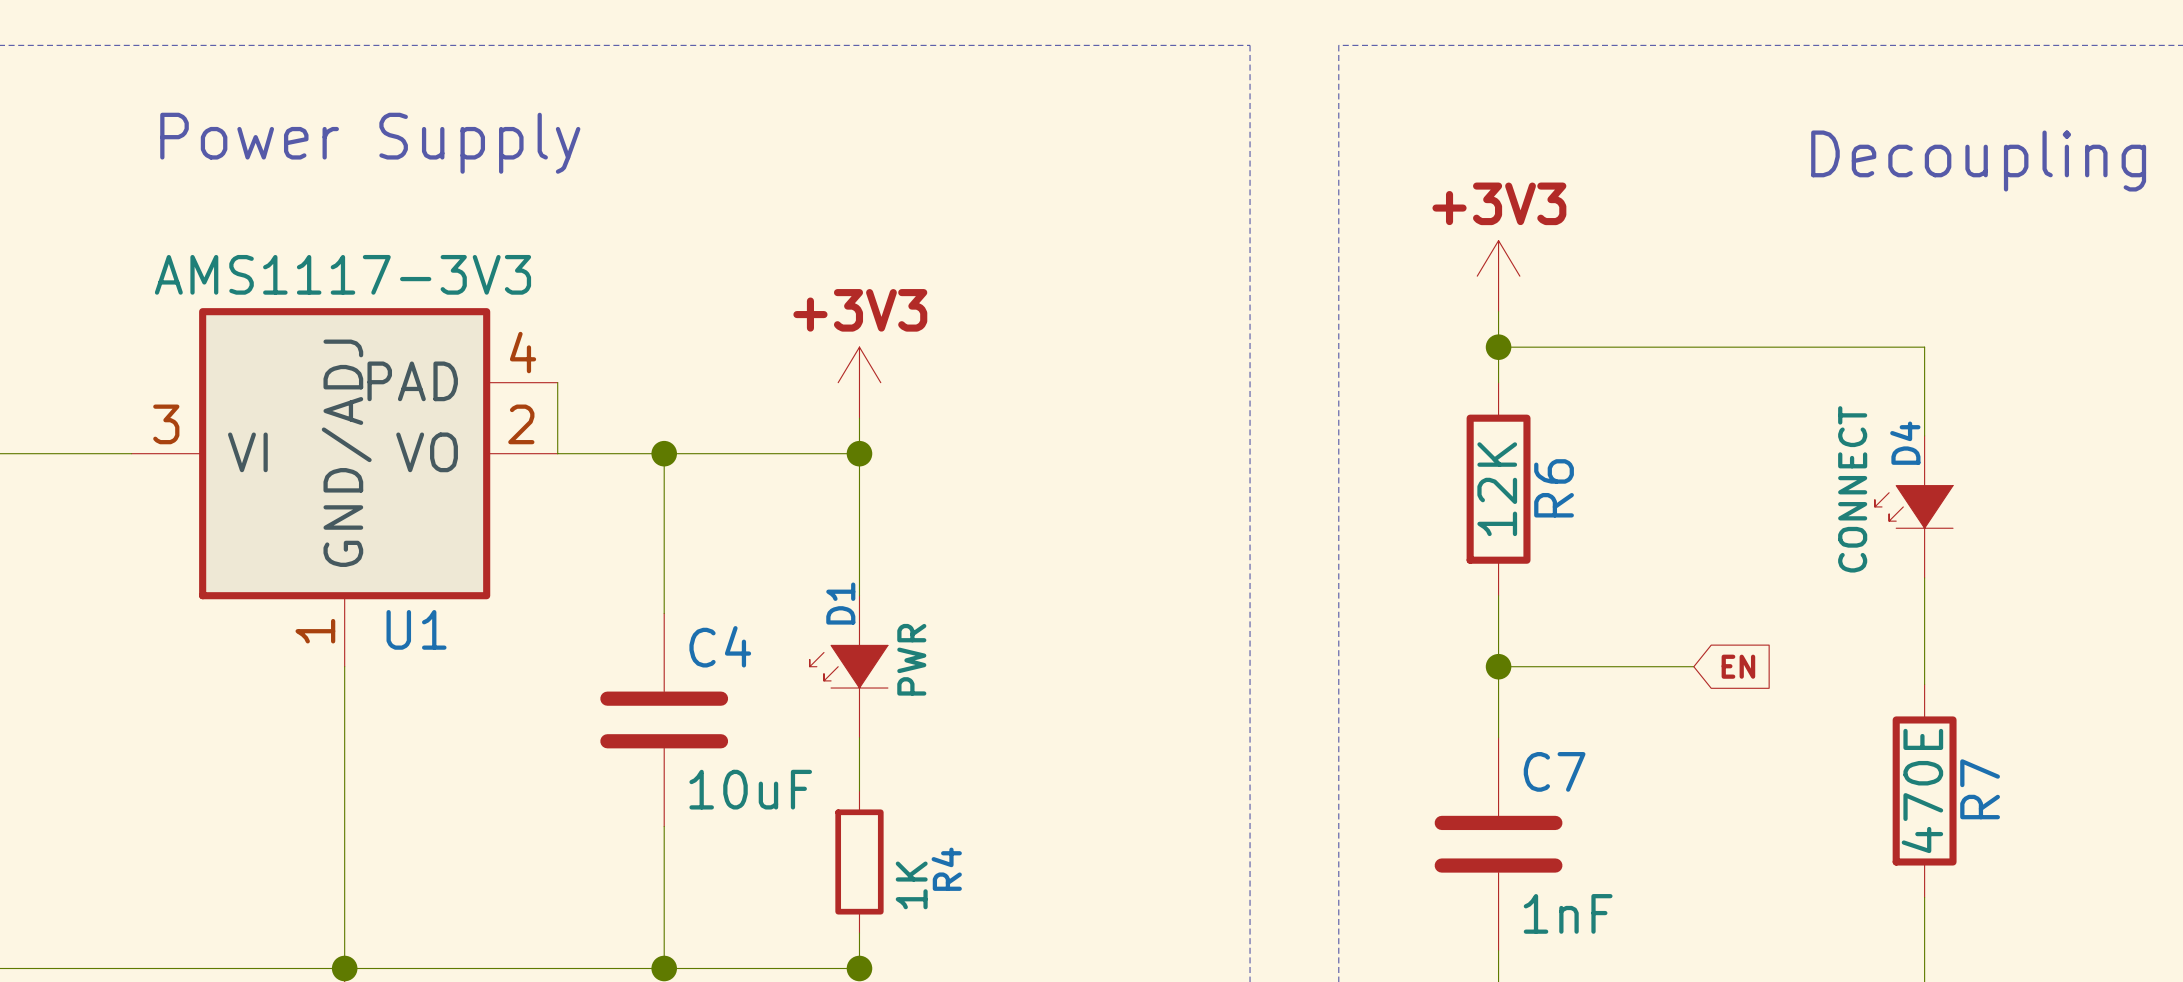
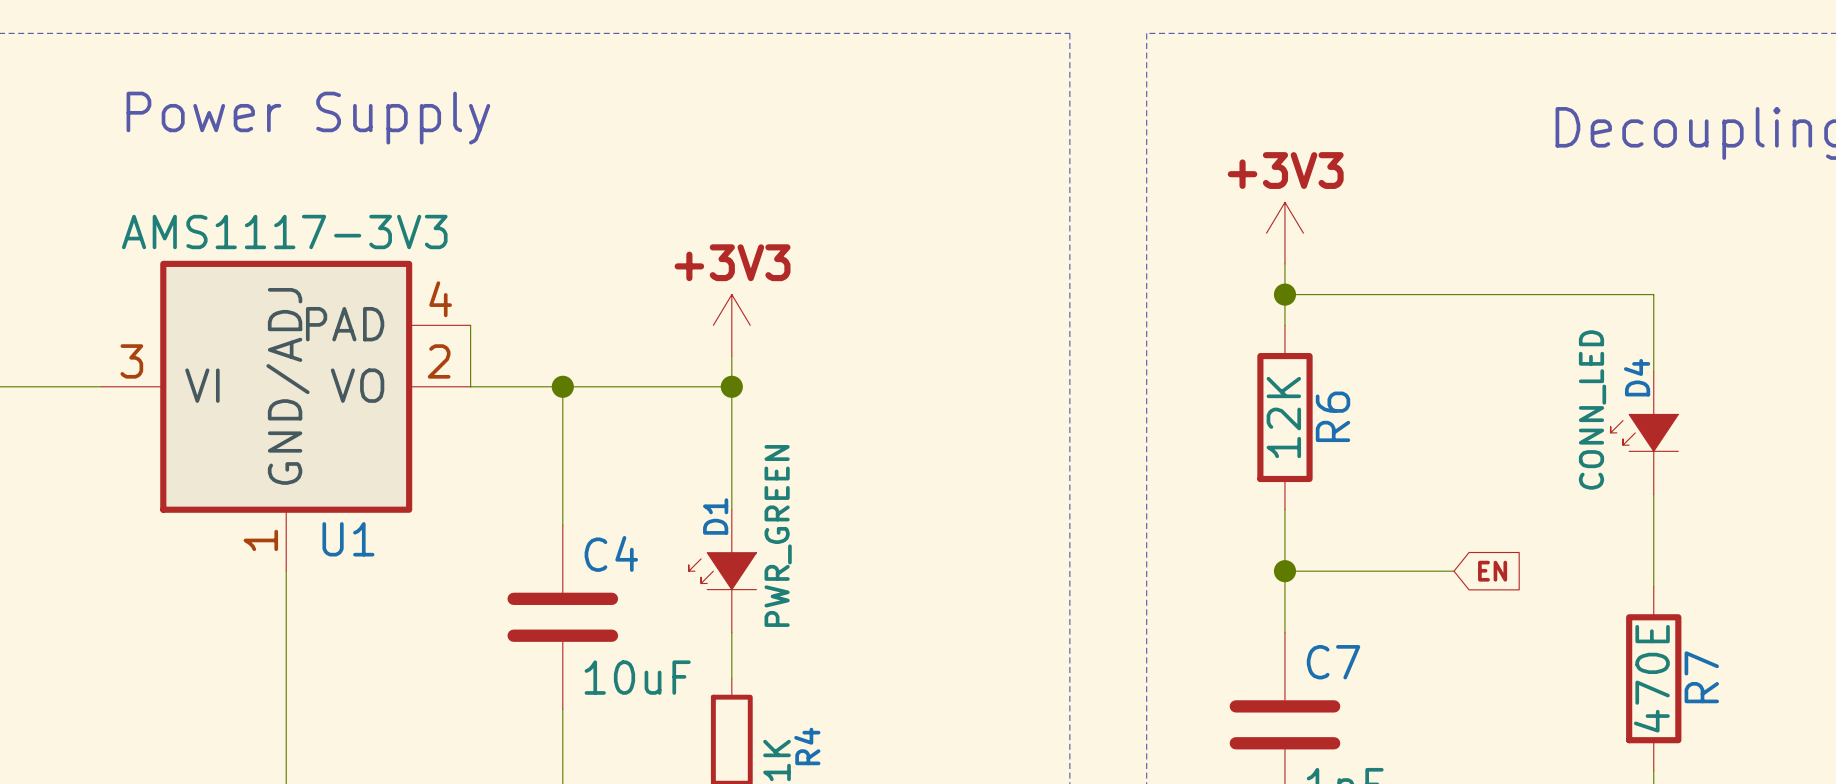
D4 value: CONNECT (1852, 489) -> CONN_LED (1592, 409)
D1 value: PWR (911, 659) -> PWR_GREEN (778, 535)

